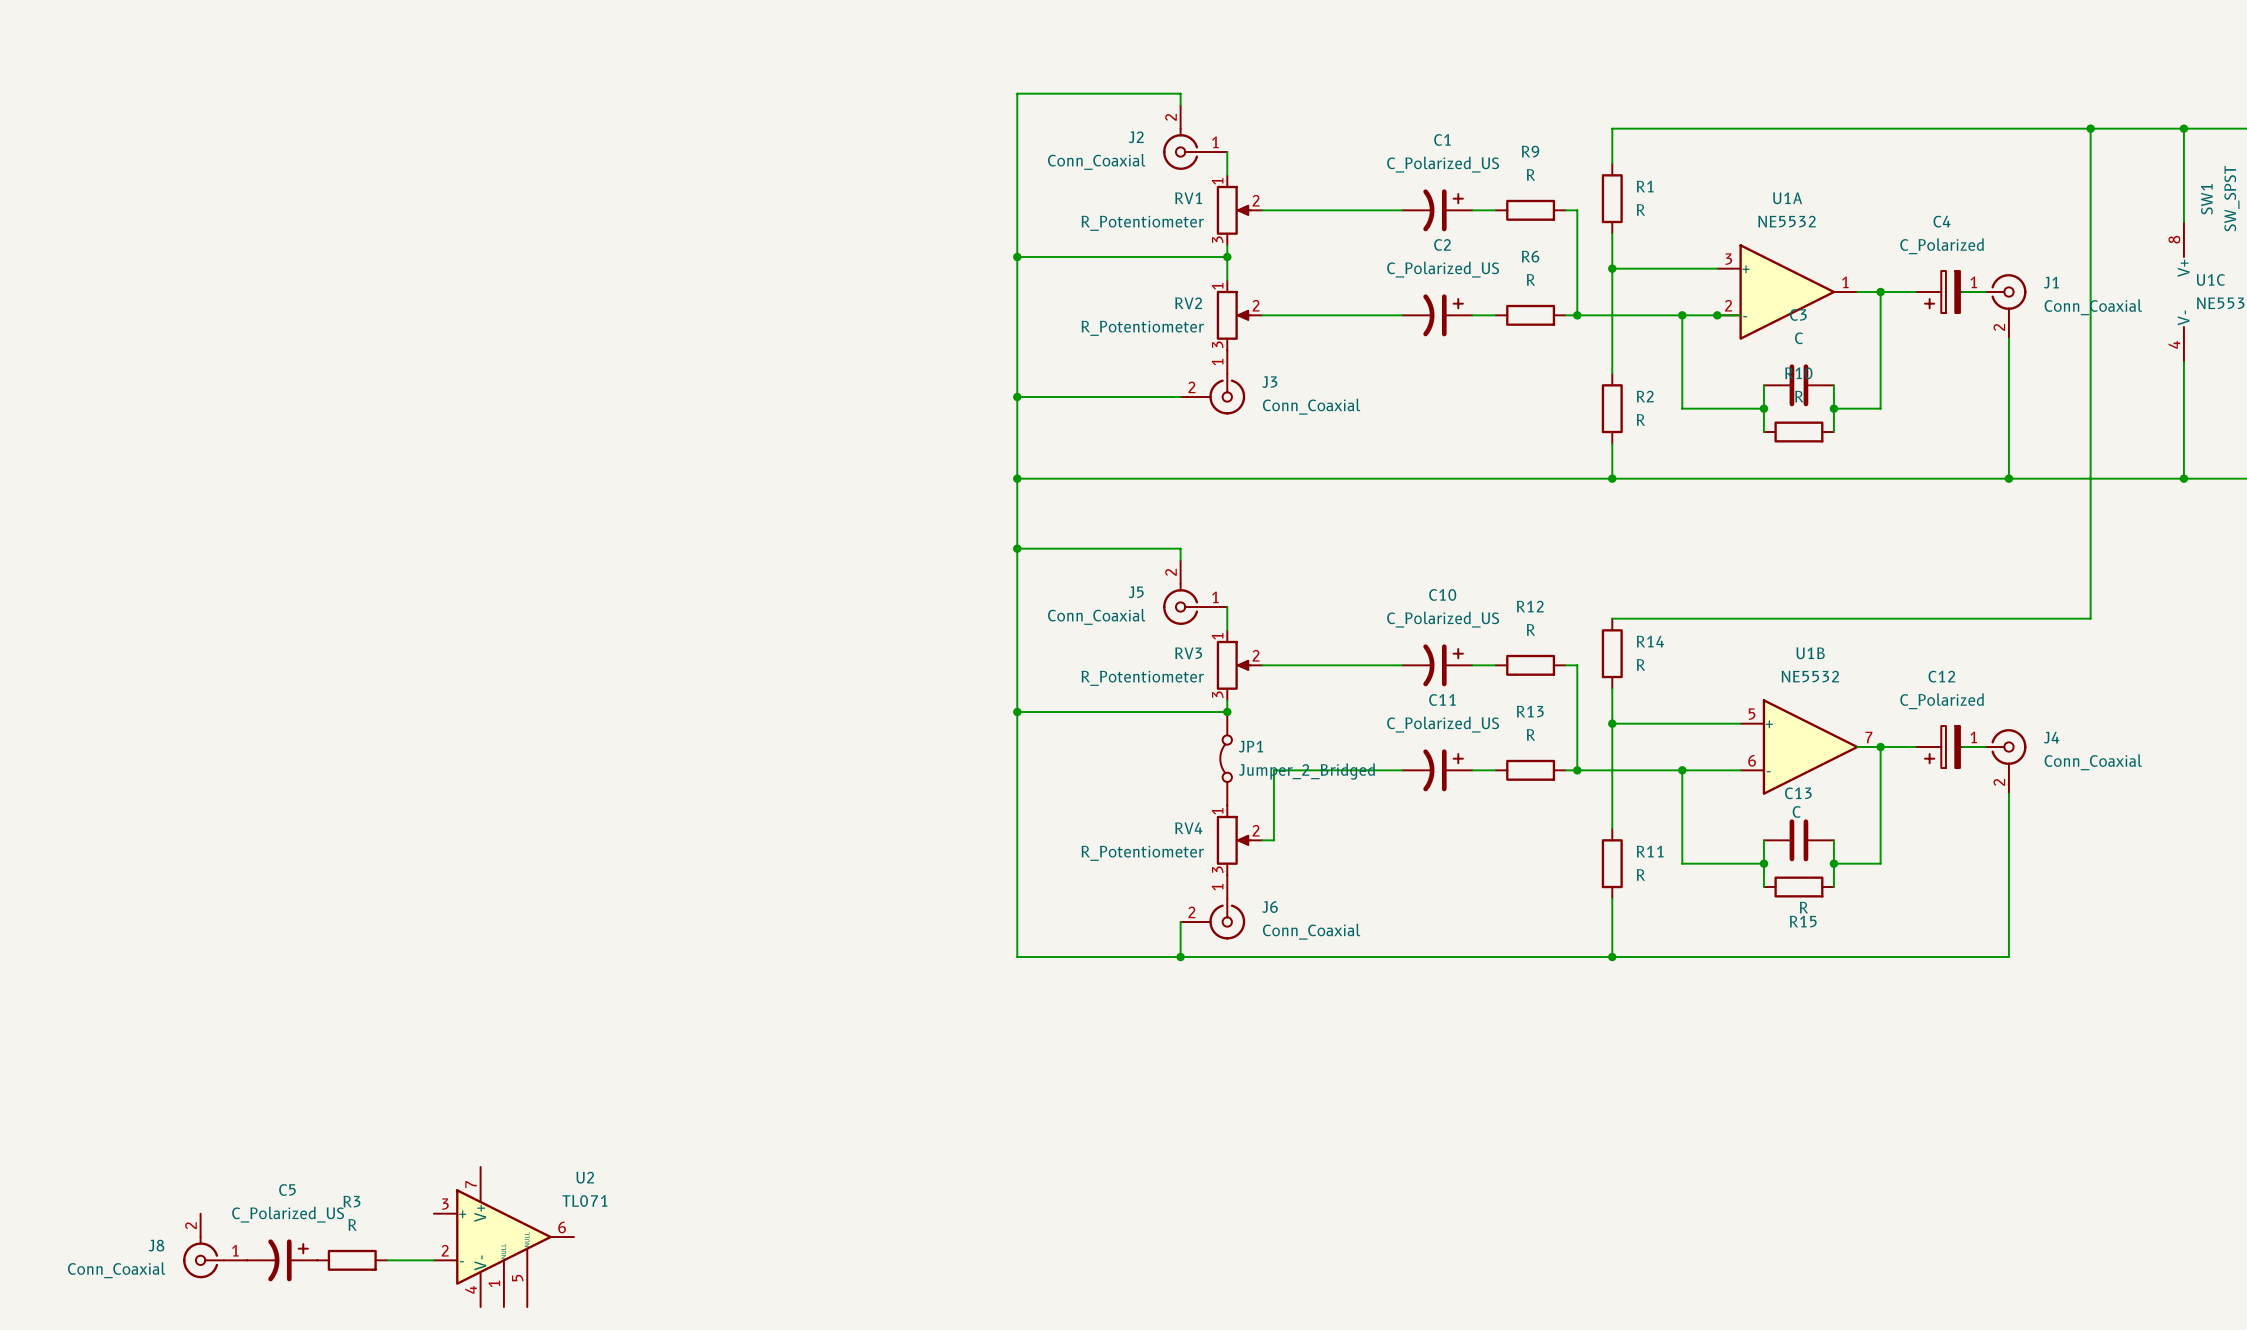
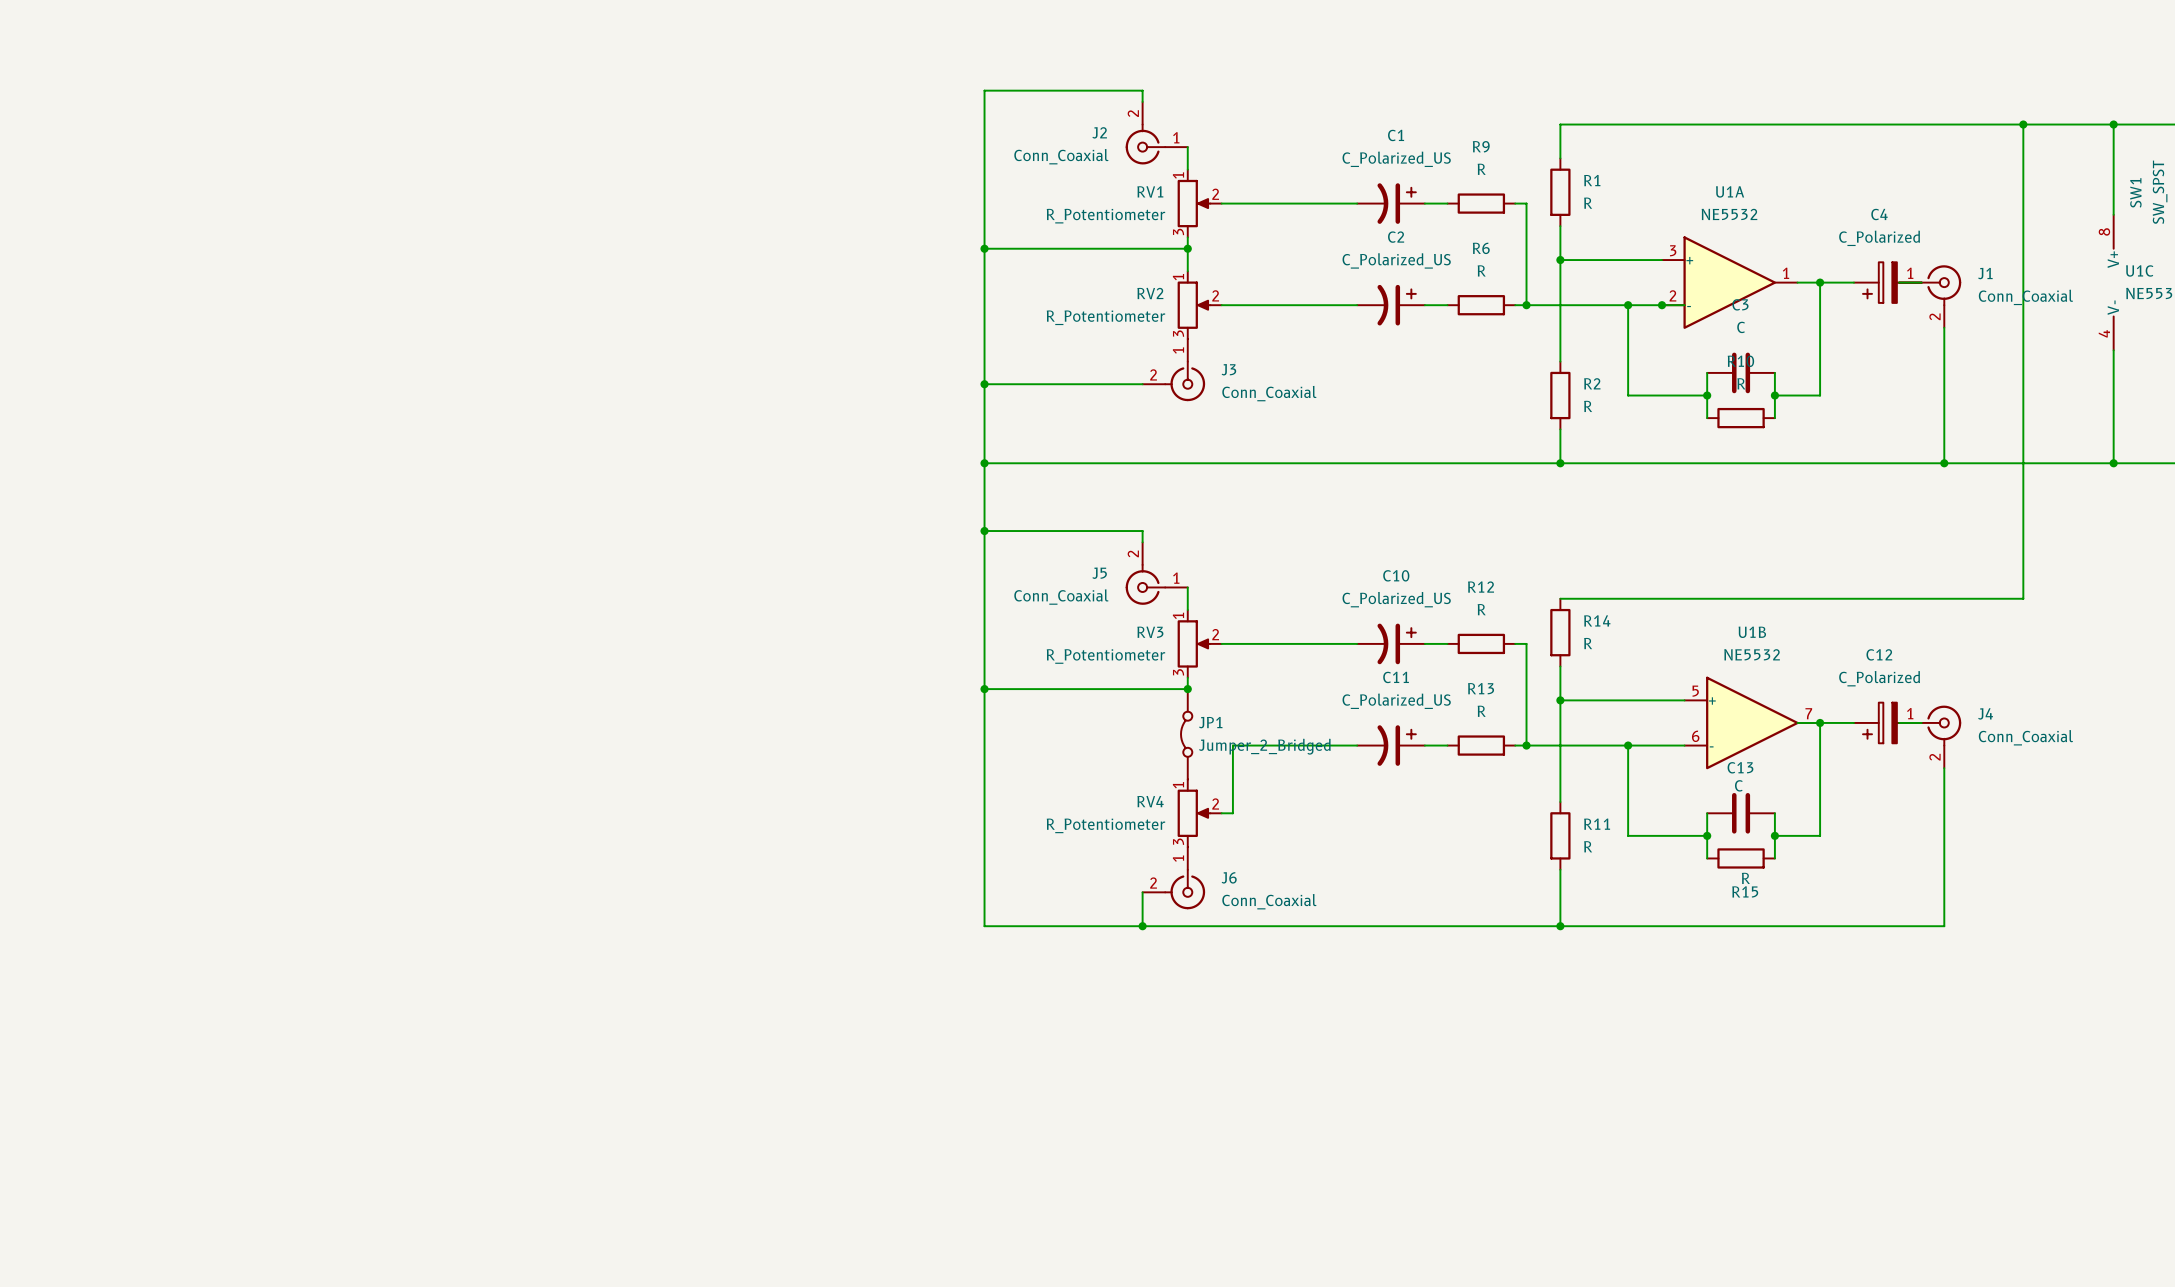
U2: TL071 (503, 1237) -> none
J8: Conn_Coaxial (215, 1245) -> none
C5: C_Polarized_US (282, 1260) -> none
R3: R (352, 1260) -> none
wire: (387, 1260) (433, 1260) -> none

